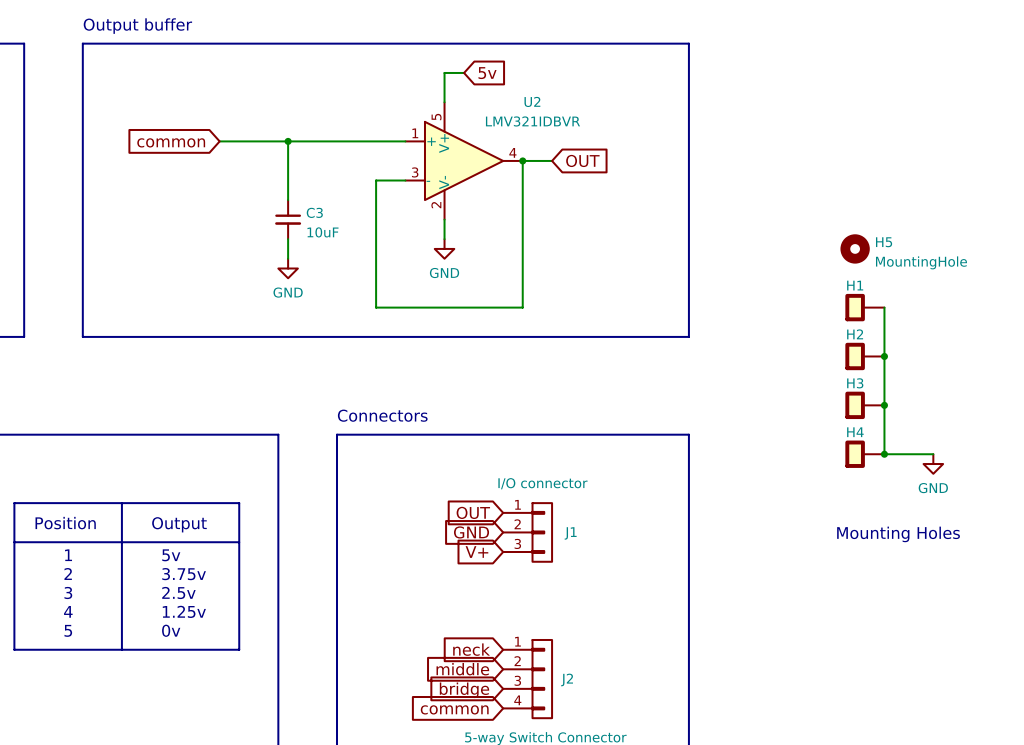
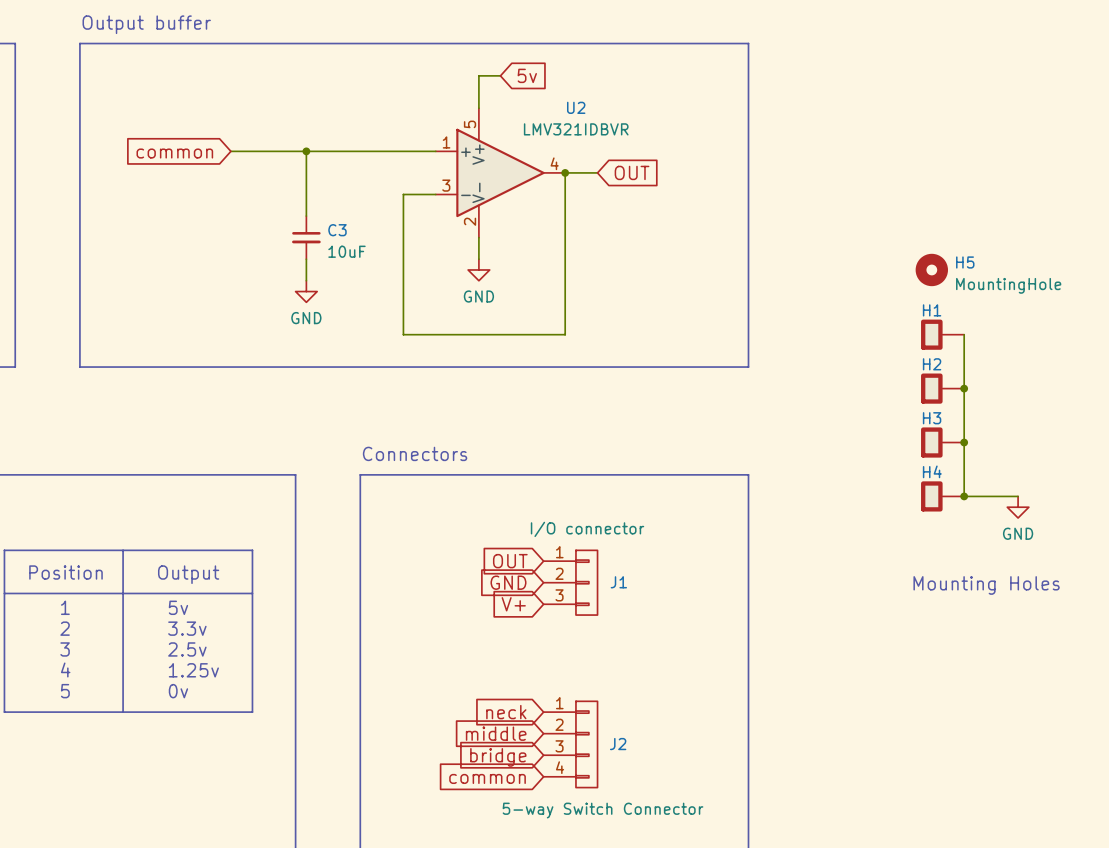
text: 3.75v (184, 574) -> 3.3v (187, 628)

